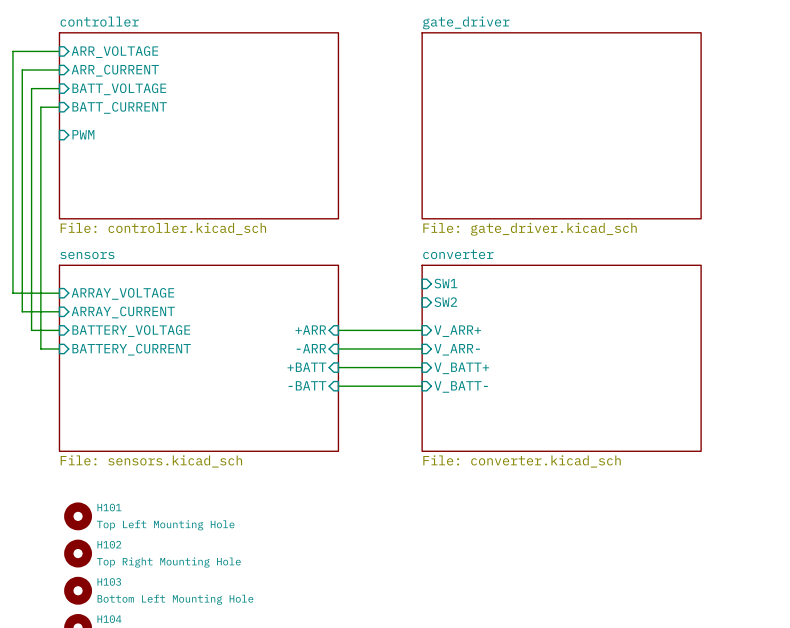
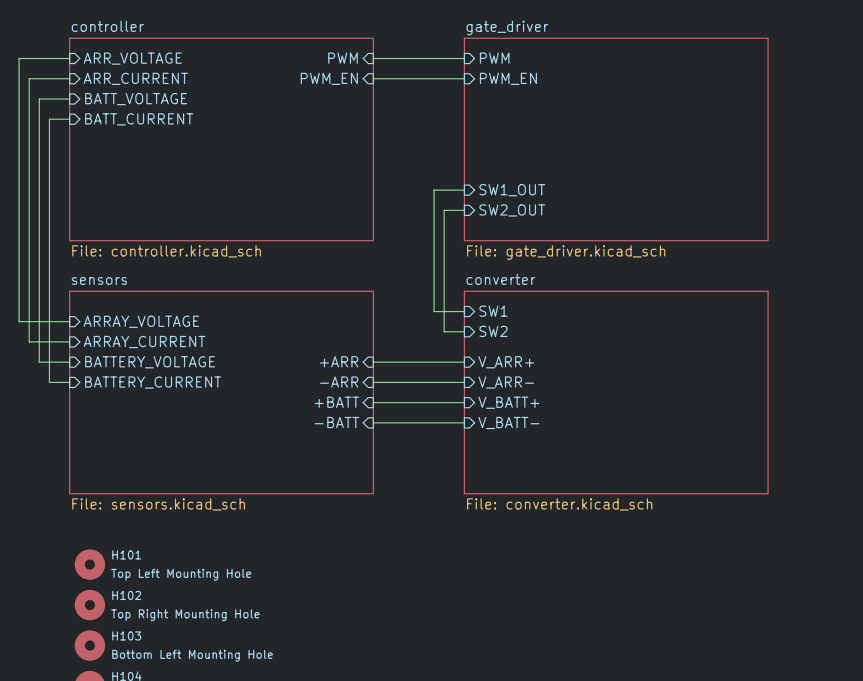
sheet pin: none -> PWM (343, 58)
wire: none -> (373, 58) (464, 58)
sheet pin: none -> PWM (494, 58)
sheet pin: none -> PWM_EN (329, 78)
wire: none -> (373, 78) (464, 78)
sheet pin: none -> PWM_EN (508, 78)
sheet pin: PWM (83, 134) -> none
wire: none -> (464, 190) (434, 190) (434, 311) (464, 311)
sheet pin: none -> SW1_OUT (512, 190)
wire: none -> (464, 210) (444, 210) (444, 331) (464, 331)
sheet pin: none -> SW2_OUT (512, 210)

